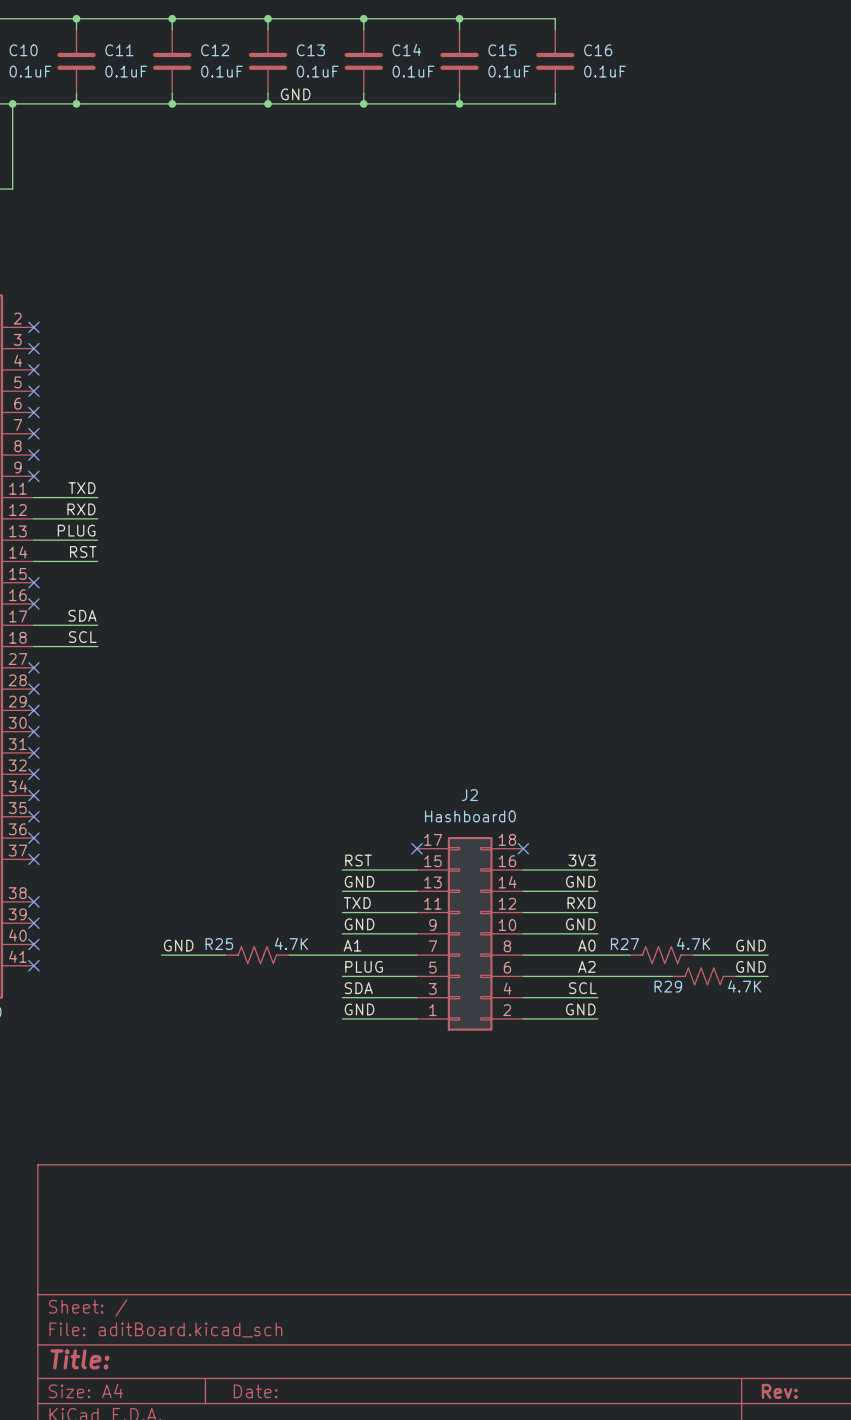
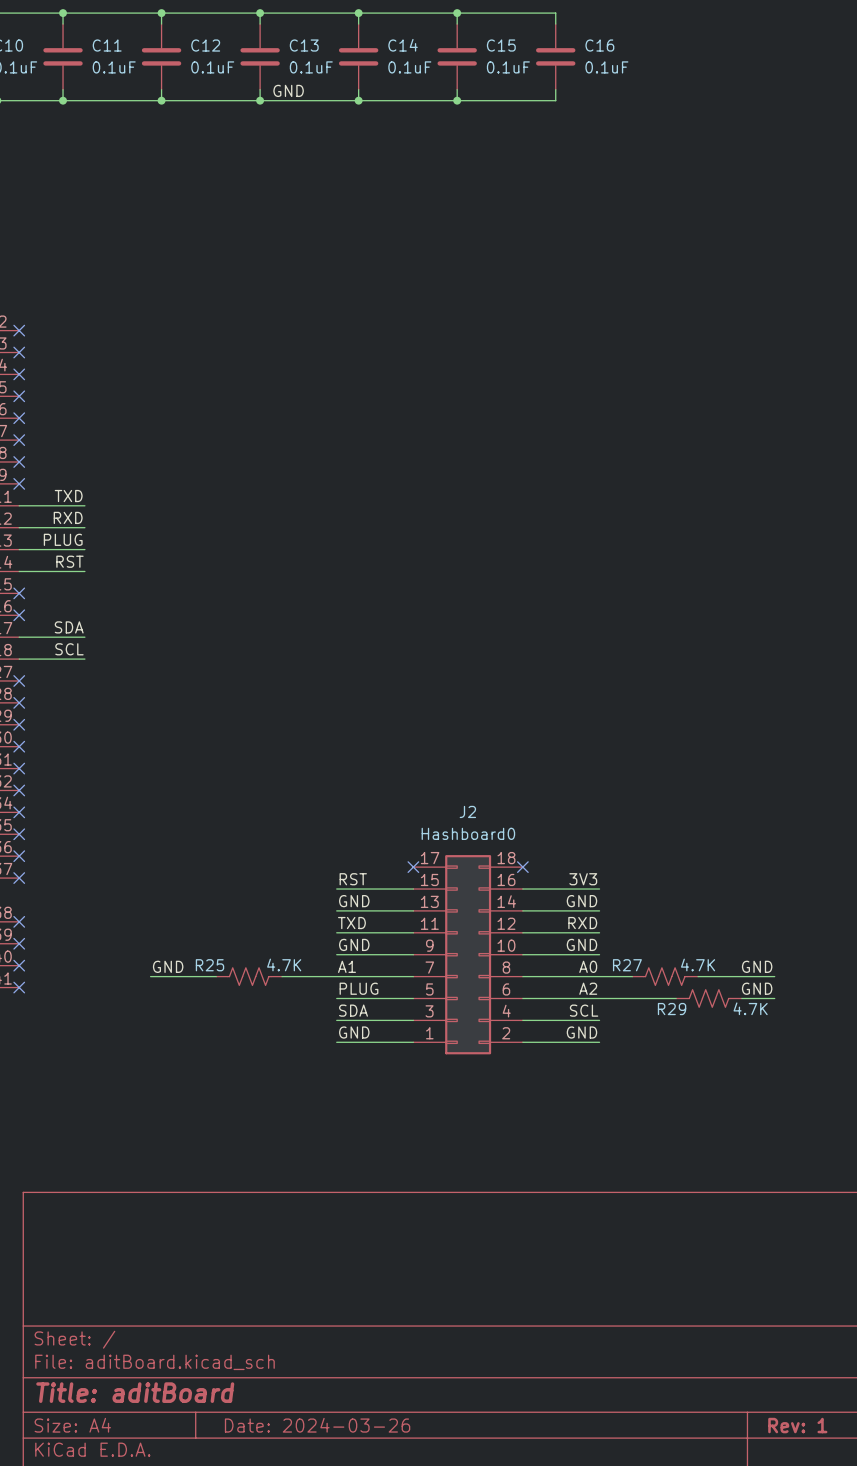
title block: Title: (80, 1359) -> Title: aditBoard (135, 1392)
title block: Date: (255, 1391) -> Date: 2024-03-26 (317, 1425)
title block: Rev: (779, 1391) -> Rev: 1 (797, 1425)

